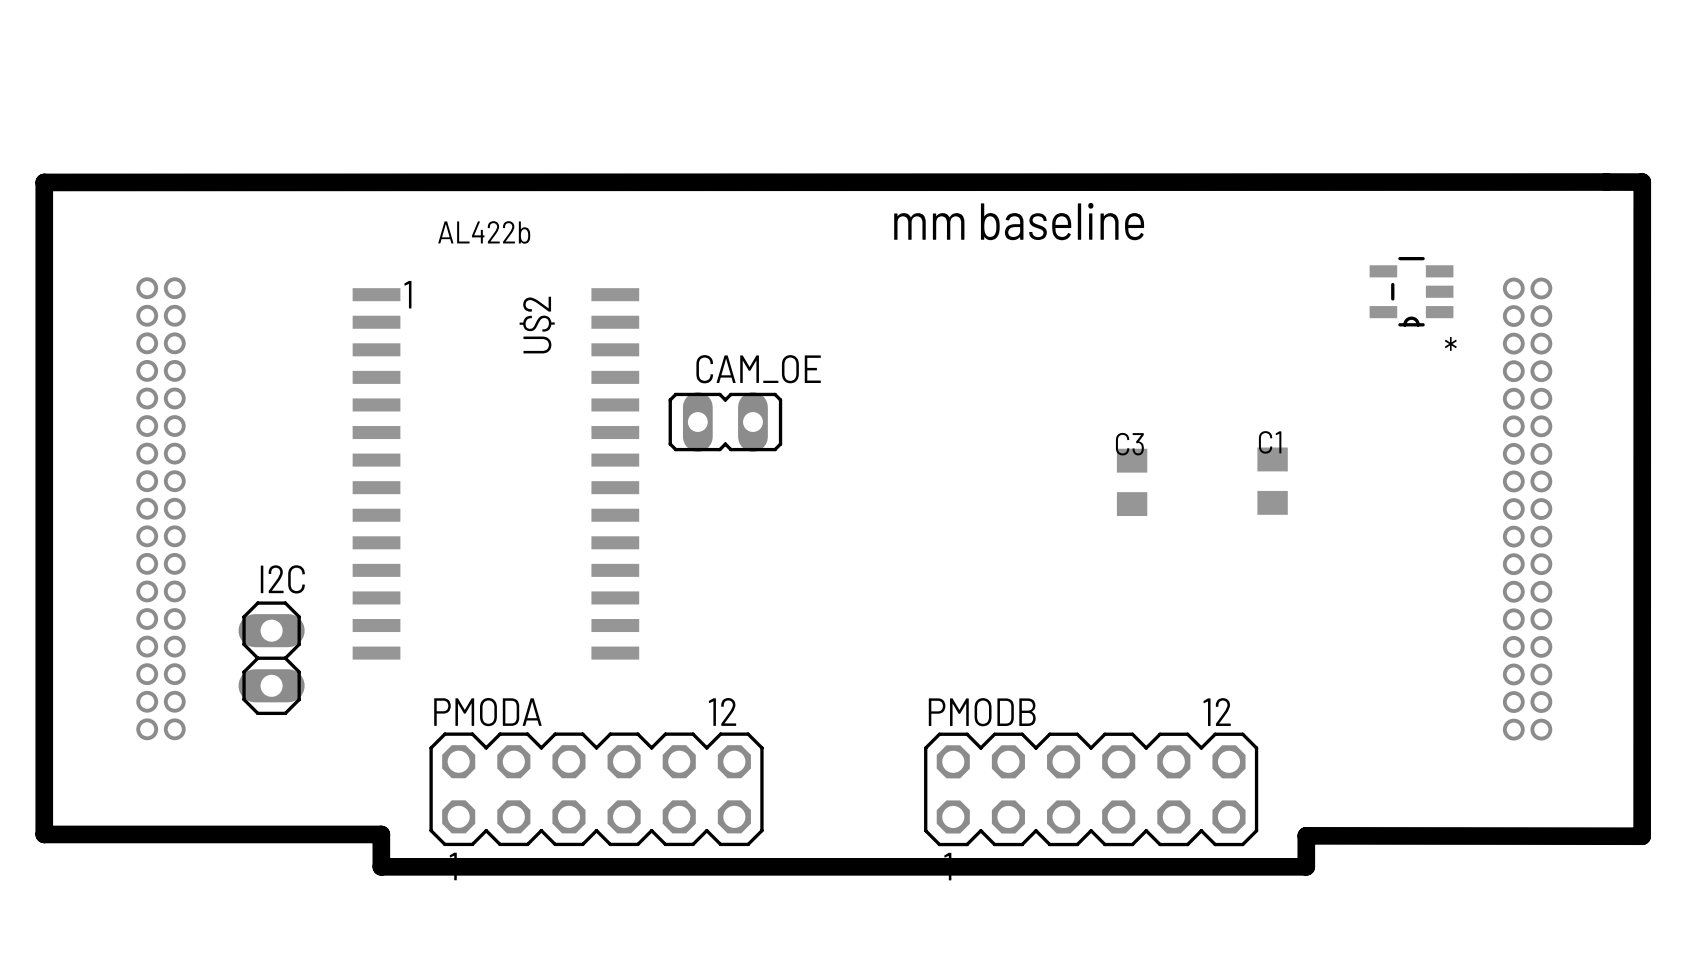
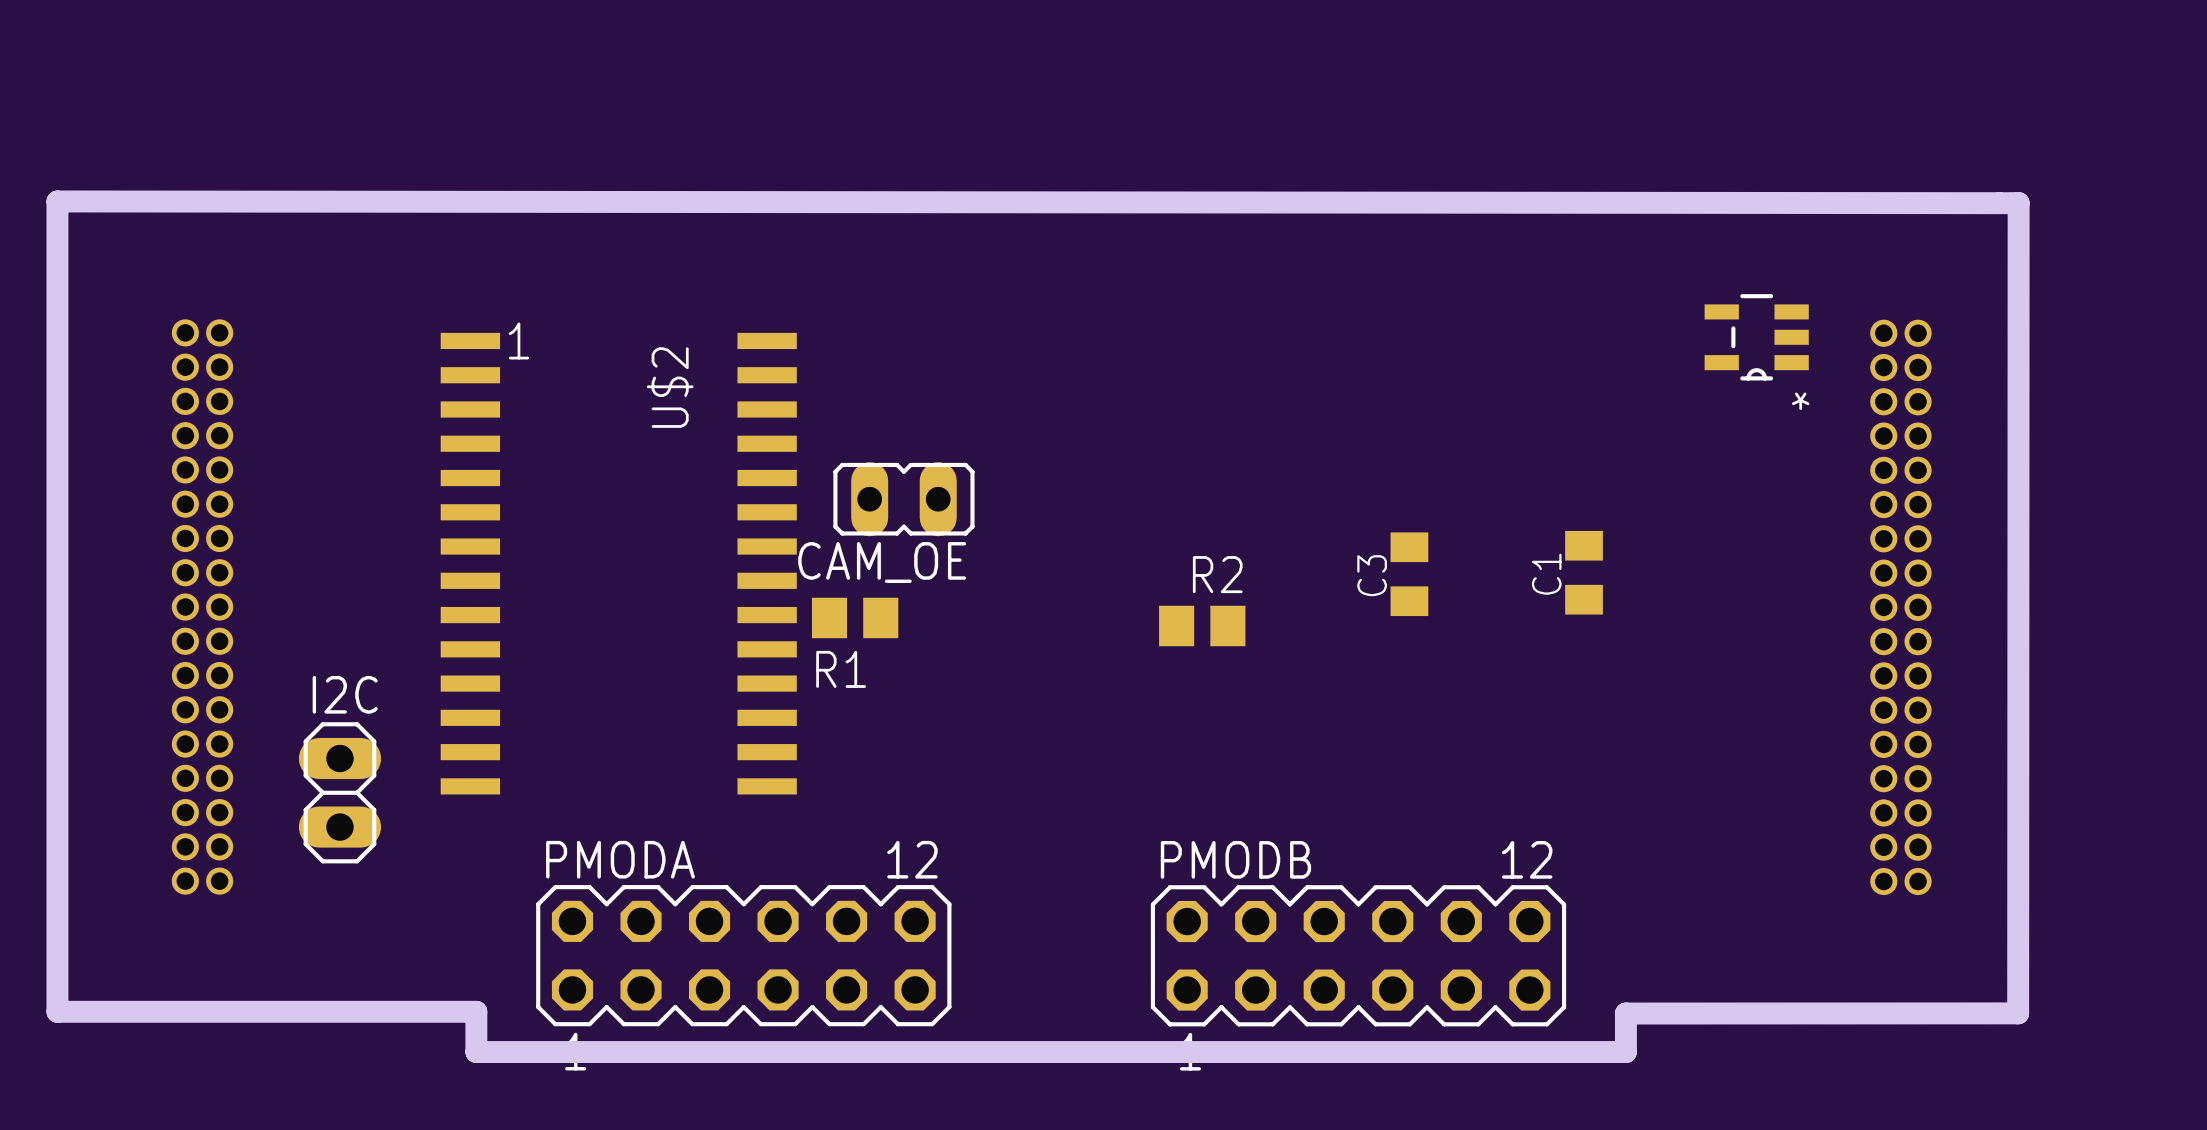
board edge: (44, 182) (1642, 182) (1642, 836) (1306, 835) -> (57, 201) (1999, 203)
board edge: none -> (1999, 203) (2018, 203) (2018, 1013) (1625, 1013)
text: mm baseline (1019, 221) -> none
text: AL422b (484, 232) -> none
CAM_OE name position: CAM_OE (758, 369) -> CAM_OE (882, 562)
C1 name rotation: 0° (1270, 442) -> 90° counterclockwise (1546, 574)
C1 name position: C1 (1270, 442) -> C1 (1546, 574)
C3 name rotation: 0° (1129, 444) -> 90° counterclockwise (1372, 575)
R1: none -> (855, 617)
R2: none -> (1202, 626)

